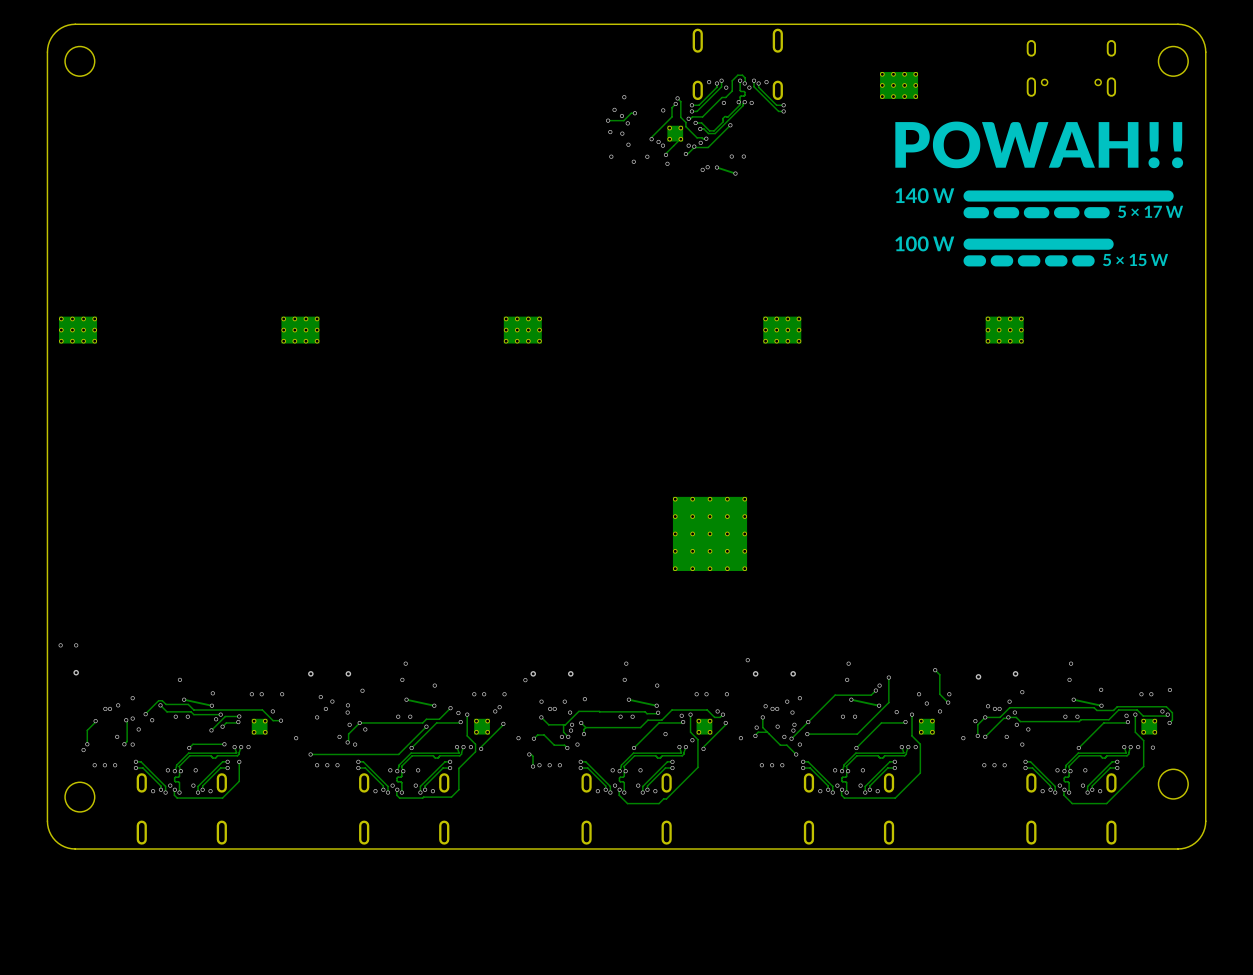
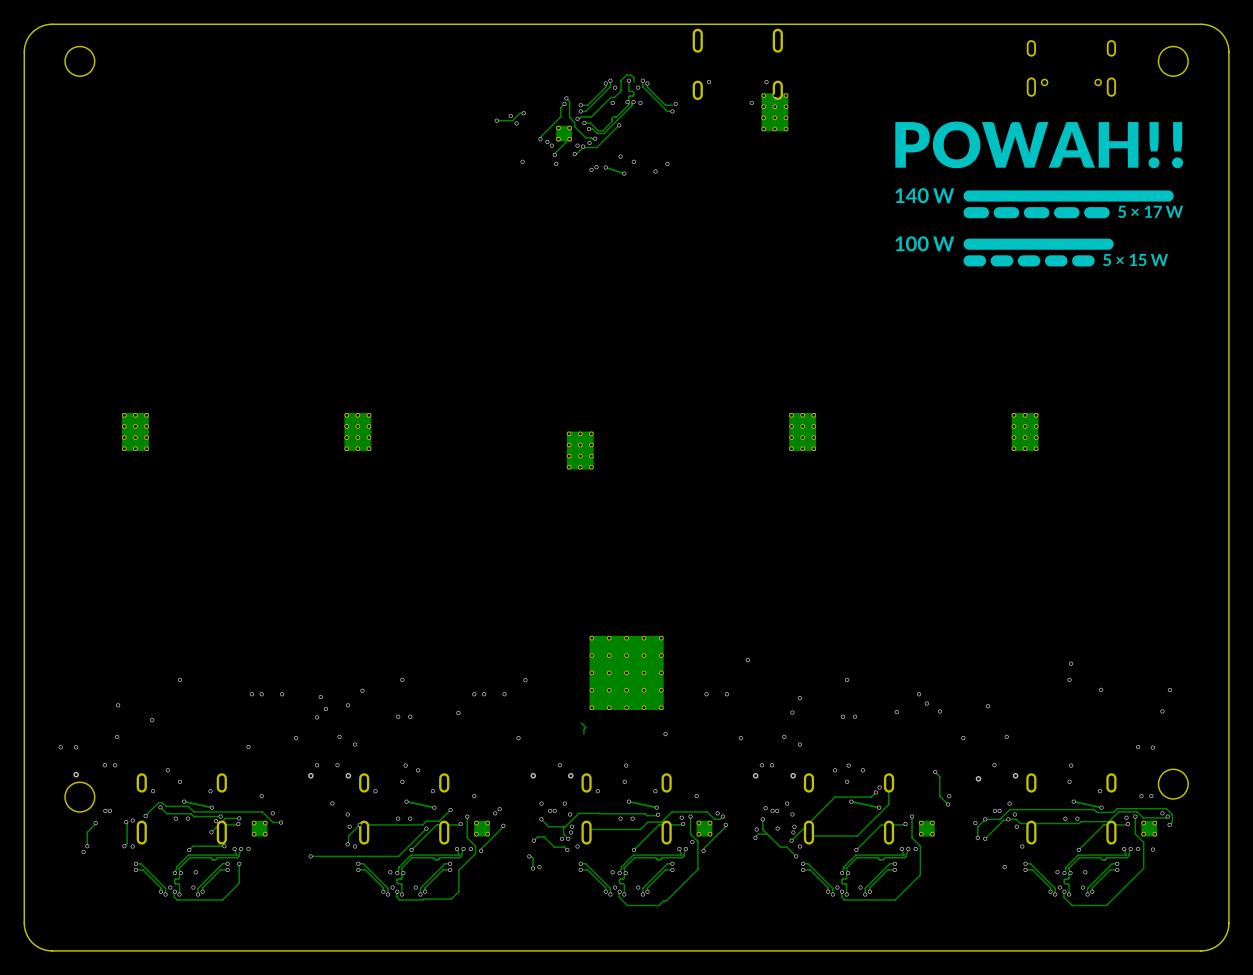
board edge: (1177, 24) (1188, 26) (1197, 32) (1203, 41) (1205, 52) (1205, 821) (1203, 831) (1197, 840) (1188, 846) (1177, 849) (75, 849) (58, 843) (51, 835) (47, 821) (47, 52) (49, 41) (55, 32) (64, 26) (75, 24) -> (1177, 24) (1204, 24) (1213, 27) (1224, 37) (1228, 52) (1228, 923) (1226, 935) (1220, 942) (1210, 949) (1201, 950) (52, 950) (35, 945) (28, 937) (24, 923) (24, 52) (28, 37) (40, 27) (48, 24) (75, 24)
via: none -> (610, 80)
via: none -> (628, 80)
via: none -> (642, 80)
track: (721, 80) (721, 86) (696, 111) (691, 111) -> (610, 80) (610, 86) (585, 111) (580, 111)
via: (721, 80) -> none
track: (740, 80) (740, 90) (744, 92) (744, 96) (740, 97) (738, 102) (740, 104) (727, 117) (722, 118) (723, 121) (714, 130) (709, 130) (701, 122) (695, 122) -> (628, 80) (628, 90) (633, 92) (632, 96) (628, 97) (627, 102) (629, 104) (616, 117) (611, 118) (612, 121) (602, 130) (598, 130) (590, 122) (584, 122)
via: (740, 80) -> none
track: (754, 80) (754, 86) (778, 111) (783, 111) -> (642, 80) (642, 86) (667, 111) (672, 111)
via: (754, 80) -> none
track: (745, 81) (742, 75) (737, 75) (732, 80) (732, 91) (725, 97) (722, 97) (702, 116) (692, 116) (690, 118) -> (634, 81) (631, 75) (626, 75) (621, 80) (621, 91) (614, 97) (610, 97) (591, 116) (581, 116) (579, 118)
via: none -> (605, 83)
via: none -> (647, 83)
track: (716, 83) (716, 87) (698, 105) (691, 105) -> (605, 83) (605, 87) (587, 105) (580, 105)
via: (716, 83) -> none
via: (744, 83) -> none
track: (758, 83) (758, 87) (776, 105) (783, 105) -> (647, 83) (647, 87) (665, 105) (672, 105)
via: (758, 83) -> none
part: (899, 85) -> none
via: none -> (615, 87)
via: none -> (638, 87)
via: (726, 87) -> none
via: (749, 87) -> none
via: (624, 97) -> none
via: none -> (566, 98)
track: (677, 98) (680, 101) (680, 117) (685, 122) (685, 126) (697, 137) (706, 139) -> (566, 98) (569, 101) (569, 117) (574, 122) (574, 126) (585, 137) (595, 139)
via: (677, 98) -> none
via: none -> (612, 102)
via: none -> (627, 102)
via: none -> (633, 102)
via: none -> (640, 102)
via: (723, 102) -> none
via: (738, 102) -> none
track: (744, 102) (715, 133) (708, 133) (703, 128) (700, 128) -> (633, 102) (603, 133) (597, 133) (592, 128) (589, 128)
via: (744, 102) -> none
via: none -> (564, 103)
track: (675, 103) (672, 107) (672, 116) (651, 137) -> (564, 103) (560, 107) (560, 116) (540, 137)
via: none -> (580, 105)
via: (691, 105) -> none
via: (783, 105) -> none
via: (614, 109) -> none
via: (663, 110) -> none
via: none -> (580, 111)
via: none -> (672, 111)
via: (691, 111) -> none
via: (783, 111) -> none
part: none -> (774, 112)
via: none -> (523, 113)
track: (634, 113) (631, 113) (623, 120) (608, 120) -> (523, 113) (520, 113) (512, 120) (496, 120)
via: (634, 113) -> none
via: none -> (510, 116)
via: (621, 116) -> none
via: none -> (577, 118)
via: (688, 118) -> none
via: none -> (496, 120)
via: (608, 120) -> none
via: none -> (584, 122)
via: (695, 122) -> none
via: none -> (516, 123)
via: (627, 123) -> none
via: none -> (619, 125)
track: (730, 125) (708, 147) (694, 146) -> (619, 125) (596, 147) (583, 146)
via: (730, 125) -> none
via: none -> (589, 128)
via: (700, 128) -> none
via: (610, 132) -> none
via: (622, 133) -> none
part position: (675, 133) -> (564, 133)
via: none -> (595, 138)
via: (706, 138) -> none
via: none -> (540, 139)
via: (651, 139) -> none
track: (680, 139) (665, 154) -> (569, 139) (554, 154)
via: none -> (547, 141)
via: (658, 141) -> none
via: none -> (589, 142)
via: (700, 142) -> none
via: (628, 144) -> none
via: none -> (551, 145)
via: none -> (577, 145)
via: (662, 145) -> none
via: (688, 145) -> none
via: none -> (583, 146)
via: (694, 146) -> none
track: (693, 148) (687, 154) -> (582, 148) (576, 154)
via: none -> (554, 154)
via: none -> (574, 154)
via: (665, 154) -> none
via: (685, 154) -> none
via: (611, 156) -> none
via: none -> (620, 156)
via: (647, 156) -> none
via: (731, 156) -> none
via: (743, 156) -> none
via: none -> (522, 161)
via: none -> (556, 163)
via: none -> (596, 167)
via: none -> (605, 167)
via: (707, 167) -> none
track: (716, 167) (735, 173) -> (605, 167) (624, 173)
via: (716, 167) -> none
via: none -> (591, 169)
via: (702, 169) -> none
via: none -> (655, 171)
via: none -> (624, 173)
via: (735, 173) -> none
part: (78, 330) -> none
part: (300, 330) -> none
part: (522, 330) -> none
part rotation: 0° (782, 330) -> 90° clockwise (802, 432)
part position: (782, 330) -> (802, 432)
part rotation: 0° (1004, 330) -> 90° clockwise (1025, 432)
part position: (1004, 330) -> (1025, 432)
part: none -> (135, 432)
part: none -> (357, 432)
part: none -> (580, 450)
part position: (710, 533) -> (626, 672)
via: (60, 645) -> none
via: (76, 645) -> none
via: (405, 663) -> none
via: (626, 663) -> none
via: (848, 663) -> none
track: (935, 670) (939, 674) (939, 694) (948, 702) -> (935, 772) (939, 776) (939, 796) (948, 804)
via: (935, 670) -> none
via: (76, 672) -> none
via: (310, 673) -> none
via: (348, 673) -> none
via: (533, 673) -> none
via: (570, 673) -> none
via: (755, 673) -> none
via: (793, 673) -> none
via: (1015, 673) -> none
via: (978, 676) -> none
track: (888, 677) (888, 702) (857, 734) (807, 734) -> (888, 779) (888, 804) (857, 836) (807, 836)
via: (888, 677) -> none
via: (624, 679) -> none
via: (434, 685) -> none
via: (657, 685) -> none
via: (879, 685) -> none
track: (875, 690) (871, 695) (835, 695) (791, 738) -> (875, 792) (871, 797) (835, 797) (791, 840)
via: (875, 690) -> none
via: (1022, 692) -> none
via: (212, 693) -> none
via: (696, 694) -> none
via: (949, 694) -> none
via: (1141, 694) -> none
via: (1151, 694) -> none
via: (132, 698) -> none
track: (184, 699) (211, 705) -> (184, 801) (211, 807)
via: (184, 699) -> none
track: (406, 699) (434, 705) -> (406, 801) (434, 807)
via: (406, 699) -> none
via: (584, 699) -> none
track: (628, 699) (656, 705) -> (628, 801) (656, 807)
via: (628, 699) -> none
track: (851, 699) (879, 705) -> (851, 801) (879, 807)
via: (851, 699) -> none
track: (1073, 699) (1101, 705) -> (1073, 801) (1101, 807)
via: (1073, 699) -> none
via: (332, 701) -> none
via: (541, 701) -> none
via: (564, 701) -> none
via: (787, 701) -> none
via: (1009, 701) -> none
via: (948, 702) -> none
track: (160, 705) (166, 711) (220, 714) -> (160, 807) (166, 813) (220, 816)
via: (160, 705) -> none
via: (211, 705) -> none
via: (434, 705) -> none
via: (656, 705) -> none
via: (879, 705) -> none
via: (1101, 705) -> none
via: (765, 706) -> none
via: (499, 707) -> none
via: (105, 708) -> none
via: (109, 708) -> none
track: (450, 708) (439, 719) (426, 719) (422, 722) (359, 722) (348, 734) (348, 742) -> (450, 810) (439, 821) (426, 821) (422, 824) (359, 824) (348, 836) (348, 844)
via: (450, 708) -> none
via: (550, 708) -> none
via: (554, 708) -> none
via: (772, 708) -> none
via: (777, 708) -> none
via: (994, 708) -> none
via: (999, 708) -> none
via: (272, 711) -> none
via: (495, 711) -> none
via: (717, 711) -> none
via: (347, 712) -> none
via: (570, 712) -> none
track: (658, 712) (578, 711) (565, 724) (548, 724) (541, 717) -> (658, 814) (578, 813) (565, 826) (548, 826) (541, 819)
via: (658, 712) -> none
via: (1014, 712) -> none
track: (145, 714) (158, 700) (162, 700) (166, 704) (188, 704) (193, 710) (262, 710) (273, 720) (280, 720) -> (145, 816) (158, 802) (162, 802) (166, 806) (188, 806) (193, 811) (262, 811) (273, 822) (280, 822)
via: (145, 714) -> none
via: (220, 714) -> none
track: (467, 714) (467, 735) (475, 744) (475, 751) (458, 768) (458, 789) (451, 797) (422, 798) (399, 798) (396, 795) (396, 789) -> (467, 816) (467, 837) (475, 846) (475, 853) (458, 870) (458, 891) (451, 899) (422, 899) (399, 899) (396, 897) (396, 891)
via: (467, 714) -> none
track: (690, 714) (690, 732) (697, 739) (697, 767) (666, 798) (659, 803) (627, 803) (619, 795) (619, 789) -> (690, 816) (690, 834) (697, 841) (697, 869) (666, 900) (659, 905) (627, 905) (619, 897) (619, 891)
via: (690, 714) -> none
track: (722, 714) (720, 717) (714, 717) (707, 710) (672, 710) (661, 720) (647, 720) (640, 727) (585, 727) -> (722, 816) (720, 819) (714, 819) (707, 811) (672, 811) (661, 822) (647, 822) (640, 829) (585, 829)
via: (722, 714) -> none
track: (912, 714) (912, 735) (920, 744) (920, 773) (895, 798) (844, 798) (841, 795) (841, 789) -> (912, 816) (912, 837) (920, 846) (920, 874) (895, 899) (844, 899) (841, 897) (841, 891)
via: (912, 714) -> none
track: (1135, 714) (1135, 732) (1143, 740) (1143, 766) (1106, 803) (1072, 803) (1063, 795) (1063, 789) -> (1135, 816) (1135, 834) (1143, 842) (1143, 868) (1106, 905) (1072, 905) (1063, 897) (1063, 891)
via: (1135, 714) -> none
track: (1167, 714) (1143, 716) (1137, 710) (1118, 710) (1108, 719) (1020, 721) (1016, 717) (1008, 717) -> (1167, 816) (1143, 817) (1137, 811) (1118, 811) (1108, 821) (1020, 823) (1016, 819) (1008, 819)
via: (1167, 714) -> none
via: (681, 715) -> none
via: (1126, 715) -> none
via: (175, 716) -> none
via: (187, 716) -> none
track: (237, 716) (225, 716) (211, 730) -> (237, 818) (225, 818) (211, 832)
via: (239, 716) -> none
via: (620, 716) -> none
via: (632, 716) -> none
via: (1065, 716) -> none
via: (1077, 716) -> none
via: (541, 717) -> none
track: (762, 717) (762, 727) (780, 745) (786, 745) (796, 754) -> (762, 819) (762, 829) (780, 847) (786, 847) (796, 856)
via: (762, 717) -> none
via: (985, 717) -> none
via: (1008, 717) -> none
via: (132, 718) -> none
track: (1007, 718) (1003, 718) (985, 736) -> (1007, 820) (1003, 820) (985, 838)
via: (216, 719) -> none
via: (126, 720) -> none
via: (280, 720) -> none
via: (95, 721) -> none
track: (127, 721) (127, 741) (124, 744) -> (127, 823) (127, 843) (124, 846)
via: (975, 721) -> none
track: (95, 722) (87, 730) (87, 744) -> (95, 823) (87, 832) (87, 846)
track: (237, 722) (226, 722) (222, 726) -> (237, 824) (226, 824) (222, 828)
via: (238, 722) -> none
via: (359, 722) -> none
track: (459, 722) (436, 722) (411, 747) -> (459, 824) (436, 824) (411, 849)
via: (460, 722) -> none
via: (581, 722) -> none
track: (682, 722) (659, 722) (634, 747) -> (682, 824) (659, 824) (634, 849)
via: (683, 722) -> none
track: (725, 722) (703, 747) -> (725, 824) (703, 849)
via: (725, 722) -> none
via: (808, 722) -> none
track: (904, 722) (881, 722) (856, 747) -> (904, 824) (881, 824) (856, 849)
via: (905, 722) -> none
track: (1127, 722) (1103, 722) (1078, 747) -> (1127, 824) (1103, 824) (1078, 849)
via: (1127, 722) -> none
track: (1169, 722) (1172, 720) (1172, 712) (1166, 706) (1117, 706) (1113, 710) (1096, 710) (1094, 707) (1009, 707) (1000, 717) (985, 717) (977, 724) (977, 735) -> (1169, 824) (1172, 822) (1172, 814) (1166, 808) (1117, 808) (1113, 812) (1096, 812) (1094, 809) (1009, 809) (1000, 819) (985, 819) (977, 826) (977, 837)
via: (1169, 722) -> none
track: (503, 723) (481, 747) -> (503, 825) (481, 849)
via: (503, 723) -> none
via: (349, 724) -> none
track: (563, 724) (563, 732) (568, 736) -> (563, 826) (563, 834) (568, 838)
via: (572, 724) -> none
via: (794, 724) -> none
via: (1016, 724) -> none
via: (222, 726) -> none
part position: (259, 726) -> (259, 828)
track: (426, 726) (398, 754) (310, 754) -> (426, 828) (398, 856) (310, 856)
via: (426, 726) -> none
part position: (482, 726) -> (482, 828)
part position: (704, 726) -> (704, 828)
via: (777, 726) -> none
part position: (926, 726) -> (926, 828)
part position: (1149, 726) -> (1149, 828)
via: (756, 727) -> none
via: (138, 729) -> none
via: (365, 729) -> none
via: (1028, 729) -> none
via: (211, 730) -> none
via: (571, 730) -> none
via: (793, 730) -> none
track: (767, 732) (758, 732) (755, 735) -> (767, 834) (758, 834) (755, 836)
via: (583, 734) -> none
via: (807, 734) -> none
via: (755, 735) -> none
via: (977, 735) -> none
via: (561, 736) -> none
via: (568, 736) -> none
via: (985, 736) -> none
track: (533, 738) (537, 735) (544, 735) (554, 745) (564, 745) (567, 747) -> (533, 840) (537, 836) (544, 836) (554, 847) (564, 847) (567, 849)
via: (533, 738) -> none
via: (791, 738) -> none
via: (692, 740) -> none
via: (347, 742) -> none
via: (87, 744) -> none
via: (124, 744) -> none
via: (132, 744) -> none
track: (224, 744) (192, 744) (189, 747) -> (224, 846) (192, 846) (189, 849)
via: (224, 744) -> none
via: (577, 744) -> none
via: (1022, 744) -> none
via: none -> (60, 747)
via: none -> (76, 747)
via: (189, 747) -> none
track: (234, 747) (236, 753) (188, 753) (176, 765) (174, 771) -> (234, 849) (236, 855) (188, 855) (176, 867) (174, 873)
via: (234, 747) -> none
track: (241, 747) (237, 755) (217, 755) (215, 758) (210, 755) (189, 755) (179, 766) -> (241, 849) (237, 857) (217, 857) (215, 859) (210, 857) (189, 857) (179, 868)
via: (241, 747) -> none
via: (411, 747) -> none
track: (457, 747) (458, 753) (411, 753) (398, 765) (397, 771) -> (457, 849) (458, 855) (411, 855) (398, 867) (397, 873)
via: (457, 747) -> none
track: (463, 747) (459, 755) (439, 755) (438, 758) (433, 755) (412, 755) (401, 766) -> (463, 849) (459, 857) (439, 857) (438, 859) (433, 857) (412, 857) (401, 868)
via: (463, 747) -> none
via: (470, 747) -> none
via: (567, 747) -> none
via: (634, 747) -> none
track: (679, 747) (681, 753) (633, 753) (621, 765) (619, 771) -> (679, 849) (681, 855) (633, 855) (621, 867) (619, 873)
via: (679, 747) -> none
track: (685, 747) (682, 755) (662, 755) (660, 758) (655, 755) (634, 755) (623, 766) -> (685, 849) (682, 857) (662, 857) (660, 859) (655, 857) (634, 857) (623, 868)
via: (685, 747) -> none
via: (856, 747) -> none
track: (901, 747) (903, 753) (855, 753) (843, 765) (842, 771) -> (901, 849) (903, 855) (855, 855) (843, 867) (842, 873)
via: (901, 747) -> none
track: (908, 747) (904, 755) (884, 755) (882, 758) (878, 755) (856, 755) (846, 766) -> (908, 849) (904, 857) (884, 857) (882, 859) (878, 857) (856, 857) (846, 868)
via: (908, 747) -> none
via: (915, 747) -> none
via: (1078, 747) -> none
track: (1124, 747) (1125, 753) (1078, 753) (1066, 765) (1064, 771) -> (1124, 849) (1125, 855) (1078, 855) (1066, 867) (1064, 873)
via: (1124, 747) -> none
track: (1130, 747) (1127, 755) (1107, 755) (1105, 758) (1100, 755) (1079, 755) (1068, 766) -> (1130, 849) (1127, 857) (1107, 857) (1105, 859) (1100, 857) (1079, 857) (1068, 868)
via: (1130, 747) -> none
via: (481, 748) -> none
via: (703, 748) -> none
via: (83, 750) -> none
via: (310, 754) -> none
via: (529, 754) -> none
track: (531, 754) (533, 764) -> (531, 856) (533, 866)
via: (796, 754) -> none
track: (135, 761) (140, 761) (165, 786) (165, 792) -> (135, 863) (140, 863) (165, 888) (165, 894)
via: (135, 761) -> none
track: (227, 761) (222, 761) (198, 786) (198, 792) -> (227, 863) (222, 863) (198, 888) (198, 894)
via: (227, 761) -> none
track: (239, 761) (239, 781) (222, 798) (177, 798) (174, 795) (174, 789) -> (239, 863) (239, 883) (222, 899) (177, 899) (174, 897) (174, 891)
via: (239, 761) -> none
track: (358, 761) (363, 761) (387, 786) (387, 792) -> (358, 863) (363, 863) (387, 888) (387, 894)
via: (358, 761) -> none
track: (450, 761) (445, 761) (420, 786) (420, 792) -> (450, 863) (445, 863) (420, 888) (420, 894)
via: (450, 761) -> none
track: (580, 761) (585, 761) (610, 786) (610, 792) -> (580, 863) (585, 863) (610, 888) (610, 894)
via: (580, 761) -> none
track: (672, 761) (667, 761) (642, 786) (642, 792) -> (672, 863) (667, 863) (642, 888) (642, 894)
via: (672, 761) -> none
track: (803, 761) (808, 761) (832, 786) (832, 792) -> (803, 863) (808, 863) (832, 888) (832, 894)
via: (803, 761) -> none
track: (894, 761) (889, 761) (865, 786) (865, 792) -> (894, 863) (889, 863) (865, 888) (865, 894)
via: (894, 761) -> none
track: (1025, 761) (1030, 761) (1055, 786) (1055, 792) -> (1025, 863) (1030, 863) (1055, 888) (1055, 894)
via: (1025, 761) -> none
track: (1117, 761) (1112, 761) (1087, 786) (1087, 792) -> (1117, 863) (1112, 863) (1087, 888) (1087, 894)
via: (1117, 761) -> none
via: (94, 765) -> none
via: (327, 765) -> none
via: none -> (405, 765)
via: (539, 765) -> none
via: (549, 765) -> none
via: none -> (626, 765)
via: (782, 765) -> none
via: none -> (848, 765)
via: (984, 765) -> none
via: (1004, 765) -> none
via: none -> (1071, 765)
track: (179, 766) (180, 771) (179, 776) (175, 777) (174, 780) (179, 782) (179, 792) -> (179, 868) (180, 873) (179, 878) (175, 879) (174, 882) (179, 884) (179, 894)
track: (401, 766) (403, 771) (401, 776) (397, 777) (397, 780) (401, 782) (401, 792) -> (401, 868) (403, 873) (401, 878) (397, 879) (397, 882) (401, 884) (401, 894)
via: (533, 766) -> none
track: (623, 766) (625, 771) (624, 776) (620, 777) (619, 780) (624, 782) (624, 792) -> (623, 868) (625, 873) (624, 878) (620, 879) (619, 882) (624, 884) (624, 894)
track: (846, 766) (848, 771) (846, 776) (842, 777) (841, 780) (846, 782) (846, 792) -> (846, 868) (848, 873) (846, 878) (842, 879) (841, 882) (846, 884) (846, 894)
track: (1068, 766) (1070, 771) (1069, 776) (1065, 777) (1064, 780) (1069, 782) (1069, 792) -> (1068, 868) (1070, 873) (1069, 878) (1065, 879) (1064, 882) (1069, 884) (1069, 894)
track: (135, 768) (142, 768) (160, 785) (160, 789) -> (135, 869) (142, 869) (160, 887) (160, 891)
via: (135, 768) -> none
track: (227, 768) (220, 768) (202, 785) (202, 789) -> (227, 869) (220, 869) (202, 887) (202, 891)
via: (227, 768) -> none
track: (358, 768) (365, 768) (383, 785) (383, 789) -> (358, 869) (365, 869) (383, 887) (383, 891)
via: (358, 768) -> none
track: (450, 768) (443, 768) (425, 785) (425, 789) -> (450, 869) (443, 869) (425, 887) (425, 891)
via: (450, 768) -> none
track: (580, 768) (587, 768) (605, 785) (605, 789) -> (580, 869) (587, 869) (605, 887) (605, 891)
via: (580, 768) -> none
track: (672, 768) (665, 768) (647, 785) (647, 789) -> (672, 869) (665, 869) (647, 887) (647, 891)
via: (672, 768) -> none
track: (803, 768) (810, 768) (828, 785) (828, 789) -> (803, 869) (810, 869) (828, 887) (828, 891)
via: (803, 768) -> none
track: (894, 768) (887, 768) (869, 785) (869, 789) -> (894, 869) (887, 869) (869, 887) (869, 891)
via: (894, 768) -> none
track: (1025, 768) (1032, 768) (1050, 785) (1050, 789) -> (1025, 869) (1032, 869) (1050, 887) (1050, 891)
via: (1025, 768) -> none
track: (1117, 768) (1110, 768) (1092, 785) (1092, 789) -> (1117, 869) (1110, 869) (1092, 887) (1092, 891)
via: (1117, 768) -> none
via: (195, 770) -> none
via: (390, 770) -> none
via: (612, 770) -> none
via: (640, 770) -> none
via: (1057, 770) -> none
via: (1085, 770) -> none
via: (174, 771) -> none
via: (180, 771) -> none
via: (397, 771) -> none
via: (403, 771) -> none
via: (619, 771) -> none
via: (625, 771) -> none
via: (842, 771) -> none
via: (848, 771) -> none
via: (1064, 771) -> none
via: (1070, 771) -> none
via: none -> (935, 772)
via: none -> (76, 774)
via: none -> (310, 775)
via: none -> (348, 775)
via: none -> (533, 775)
via: none -> (570, 775)
via: none -> (755, 775)
via: none -> (793, 775)
via: none -> (1015, 775)
via: none -> (978, 778)
via: none -> (179, 781)
via: none -> (402, 781)
via: none -> (624, 781)
via: none -> (847, 781)
via: none -> (1069, 781)
via: (170, 785) -> none
via: (193, 785) -> none
via: (392, 785) -> none
via: (415, 785) -> none
via: (615, 785) -> none
via: (638, 785) -> none
via: (837, 785) -> none
via: (860, 785) -> none
via: (1059, 785) -> none
via: (1082, 785) -> none
via: none -> (879, 787)
via: (160, 789) -> none
via: (174, 789) -> none
via: (202, 789) -> none
via: (383, 789) -> none
via: (397, 789) -> none
via: (425, 789) -> none
via: (605, 789) -> none
via: (619, 789) -> none
via: (647, 789) -> none
via: (828, 789) -> none
via: (842, 789) -> none
via: (869, 789) -> none
via: (1050, 789) -> none
via: (1064, 789) -> none
via: (1092, 789) -> none
via: (820, 791) -> none
via: (877, 791) -> none
via: (1042, 791) -> none
via: (165, 792) -> none
via: (179, 792) -> none
via: (198, 792) -> none
via: (387, 792) -> none
via: (401, 792) -> none
via: (420, 792) -> none
via: (610, 792) -> none
via: (624, 792) -> none
via: (642, 792) -> none
via: (832, 792) -> none
via: (846, 792) -> none
via: (865, 792) -> none
via: none -> (875, 792)
via: (1055, 792) -> none
via: (1069, 792) -> none
via: (1087, 792) -> none
via: none -> (261, 796)
via: none -> (474, 796)
via: none -> (696, 796)
via: none -> (949, 796)
via: none -> (1141, 796)
via: none -> (1151, 796)
via: none -> (184, 801)
via: none -> (406, 801)
via: none -> (628, 801)
via: none -> (851, 801)
via: none -> (1073, 801)
via: none -> (332, 803)
via: none -> (541, 803)
via: none -> (564, 803)
via: none -> (787, 803)
via: none -> (1009, 803)
via: none -> (948, 804)
via: none -> (160, 807)
via: none -> (211, 807)
via: none -> (434, 807)
via: none -> (656, 807)
via: none -> (879, 807)
via: none -> (1101, 807)
via: none -> (765, 808)
via: none -> (499, 809)
via: none -> (105, 810)
via: none -> (109, 810)
via: none -> (450, 810)
via: none -> (550, 810)
via: none -> (554, 810)
via: none -> (772, 810)
via: none -> (777, 810)
via: none -> (994, 810)
via: none -> (999, 810)
via: none -> (272, 813)
via: none -> (495, 813)
via: none -> (717, 813)
via: none -> (1162, 813)
via: none -> (347, 814)
via: none -> (570, 814)
via: none -> (658, 814)
via: none -> (792, 814)
via: none -> (1014, 814)
via: none -> (145, 816)
via: none -> (220, 816)
via: none -> (467, 816)
via: none -> (690, 816)
via: none -> (722, 816)
via: none -> (912, 816)
via: none -> (1135, 816)
via: none -> (1167, 816)
via: none -> (681, 817)
via: none -> (1126, 817)
via: none -> (175, 818)
via: none -> (187, 818)
via: none -> (239, 818)
via: none -> (398, 818)
via: none -> (410, 818)
via: none -> (620, 818)
via: none -> (632, 818)
via: none -> (1065, 818)
via: none -> (1077, 818)
via: none -> (541, 819)
via: none -> (762, 819)
via: none -> (985, 819)
via: none -> (1008, 819)
via: none -> (132, 820)
via: none -> (216, 821)
via: none -> (126, 822)
via: none -> (280, 822)
via: none -> (95, 823)
via: none -> (238, 823)
via: none -> (460, 823)
via: none -> (683, 823)
via: none -> (905, 823)
via: none -> (975, 823)
via: none -> (1127, 823)
via: none -> (359, 824)
via: none -> (725, 824)
via: none -> (1169, 824)
via: none -> (503, 825)
via: none -> (349, 826)
via: none -> (572, 826)
via: none -> (794, 826)
via: none -> (1016, 826)
via: none -> (426, 828)
via: none -> (777, 828)
via: none -> (756, 829)
via: none -> (211, 832)
via: none -> (571, 832)
via: none -> (793, 832)
via: none -> (755, 837)
via: none -> (977, 837)
via: none -> (561, 838)
via: none -> (568, 838)
via: none -> (985, 838)
via: none -> (533, 840)
via: none -> (791, 840)
via: none -> (692, 842)
via: none -> (347, 844)
via: none -> (87, 846)
via: none -> (124, 846)
via: none -> (132, 846)
via: none -> (224, 846)
via: none -> (355, 846)
via: none -> (577, 846)
via: none -> (799, 846)
via: none -> (1022, 846)
via: none -> (189, 849)
via: none -> (234, 849)
via: none -> (241, 849)
via: none -> (248, 849)
via: none -> (411, 849)
via: none -> (457, 849)
via: none -> (463, 849)
via: none -> (470, 849)
via: none -> (567, 849)
via: none -> (634, 849)
via: none -> (679, 849)
via: none -> (685, 849)
via: none -> (856, 849)
via: none -> (901, 849)
via: none -> (908, 849)
via: none -> (915, 849)
via: none -> (1078, 849)
via: none -> (1124, 849)
via: none -> (1130, 849)
via: none -> (1138, 849)
via: none -> (1152, 849)
via: none -> (481, 850)
via: none -> (703, 850)
via: none -> (83, 851)
via: none -> (310, 856)
via: none -> (529, 856)
via: none -> (796, 856)
via: none -> (135, 863)
via: none -> (227, 863)
via: none -> (239, 863)
via: none -> (358, 863)
via: none -> (450, 863)
via: none -> (580, 863)
via: none -> (672, 863)
via: none -> (803, 863)
via: none -> (894, 863)
via: none -> (1025, 863)
via: none -> (1117, 863)
via: none -> (539, 867)
via: none -> (1004, 867)
via: none -> (533, 868)
via: none -> (135, 869)
via: none -> (227, 869)
via: none -> (358, 869)
via: none -> (450, 869)
via: none -> (580, 869)
via: none -> (672, 869)
via: none -> (803, 869)
via: none -> (894, 869)
via: none -> (1025, 869)
via: none -> (1117, 869)
via: none -> (195, 872)
via: none -> (390, 872)
via: none -> (612, 872)
via: none -> (1057, 872)
via: none -> (1085, 872)
via: none -> (174, 873)
via: none -> (180, 873)
via: none -> (397, 873)
via: none -> (403, 873)
via: none -> (619, 873)
via: none -> (625, 873)
via: none -> (842, 873)
via: none -> (848, 873)
via: none -> (1064, 873)
via: none -> (1070, 873)
via: none -> (170, 887)
via: none -> (193, 887)
via: none -> (392, 887)
via: none -> (415, 887)
via: none -> (615, 887)
via: none -> (638, 887)
via: none -> (837, 887)
via: none -> (860, 887)
via: none -> (1059, 887)
via: none -> (1082, 887)
via: none -> (160, 891)
via: none -> (174, 891)
via: none -> (202, 891)
via: none -> (383, 891)
via: none -> (397, 891)
via: none -> (425, 891)
via: none -> (605, 891)
via: none -> (619, 891)
via: none -> (647, 891)
via: none -> (828, 891)
via: none -> (842, 891)
via: none -> (869, 891)
via: none -> (1050, 891)
via: none -> (1064, 891)
via: none -> (1092, 891)
via: none -> (165, 894)
via: none -> (179, 894)
via: none -> (198, 894)
via: none -> (387, 894)
via: none -> (401, 894)
via: none -> (420, 894)
via: none -> (610, 894)
via: none -> (624, 894)
via: none -> (642, 894)
via: none -> (832, 894)
via: none -> (846, 894)
via: none -> (865, 894)
via: none -> (1055, 894)
via: none -> (1069, 894)
via: none -> (1087, 894)

